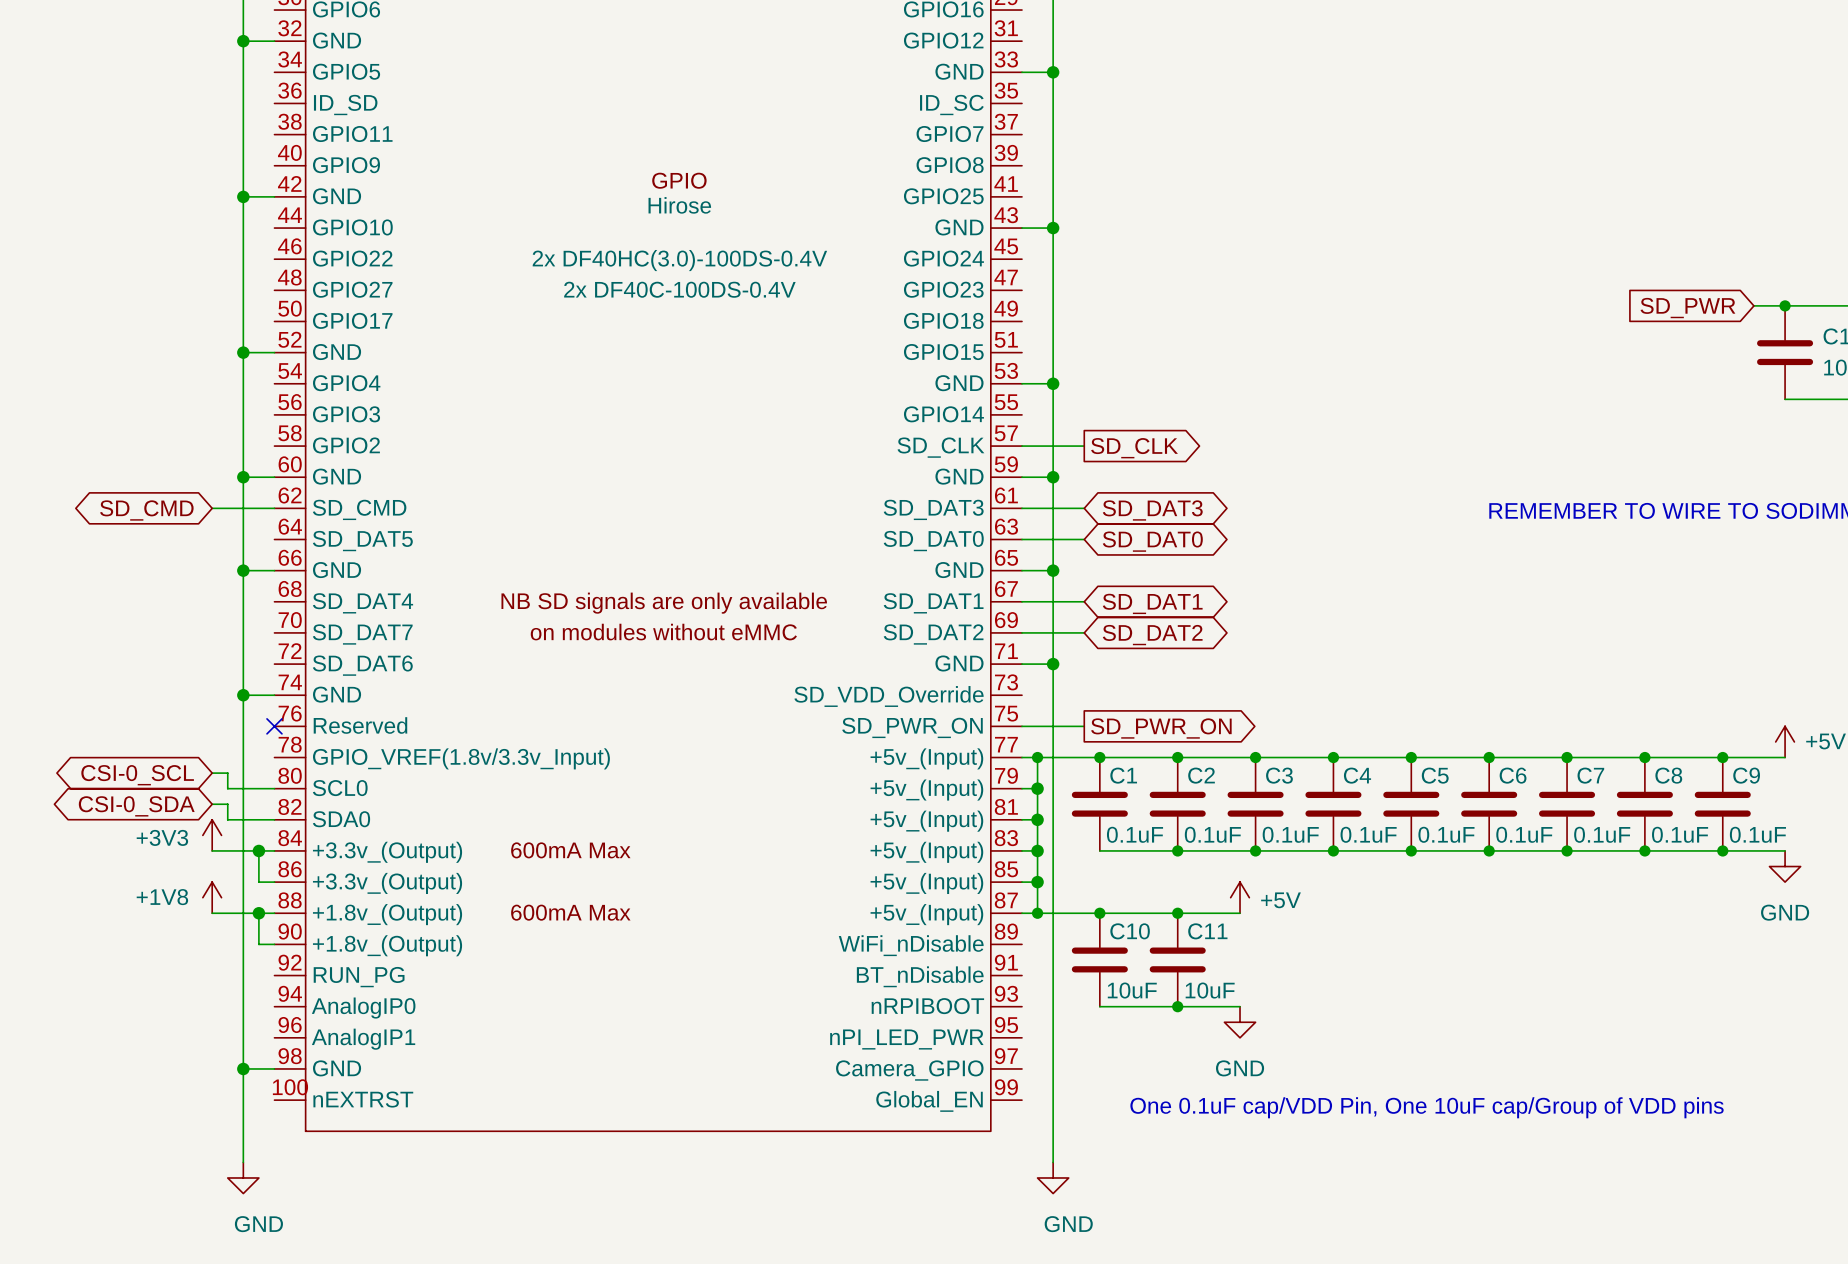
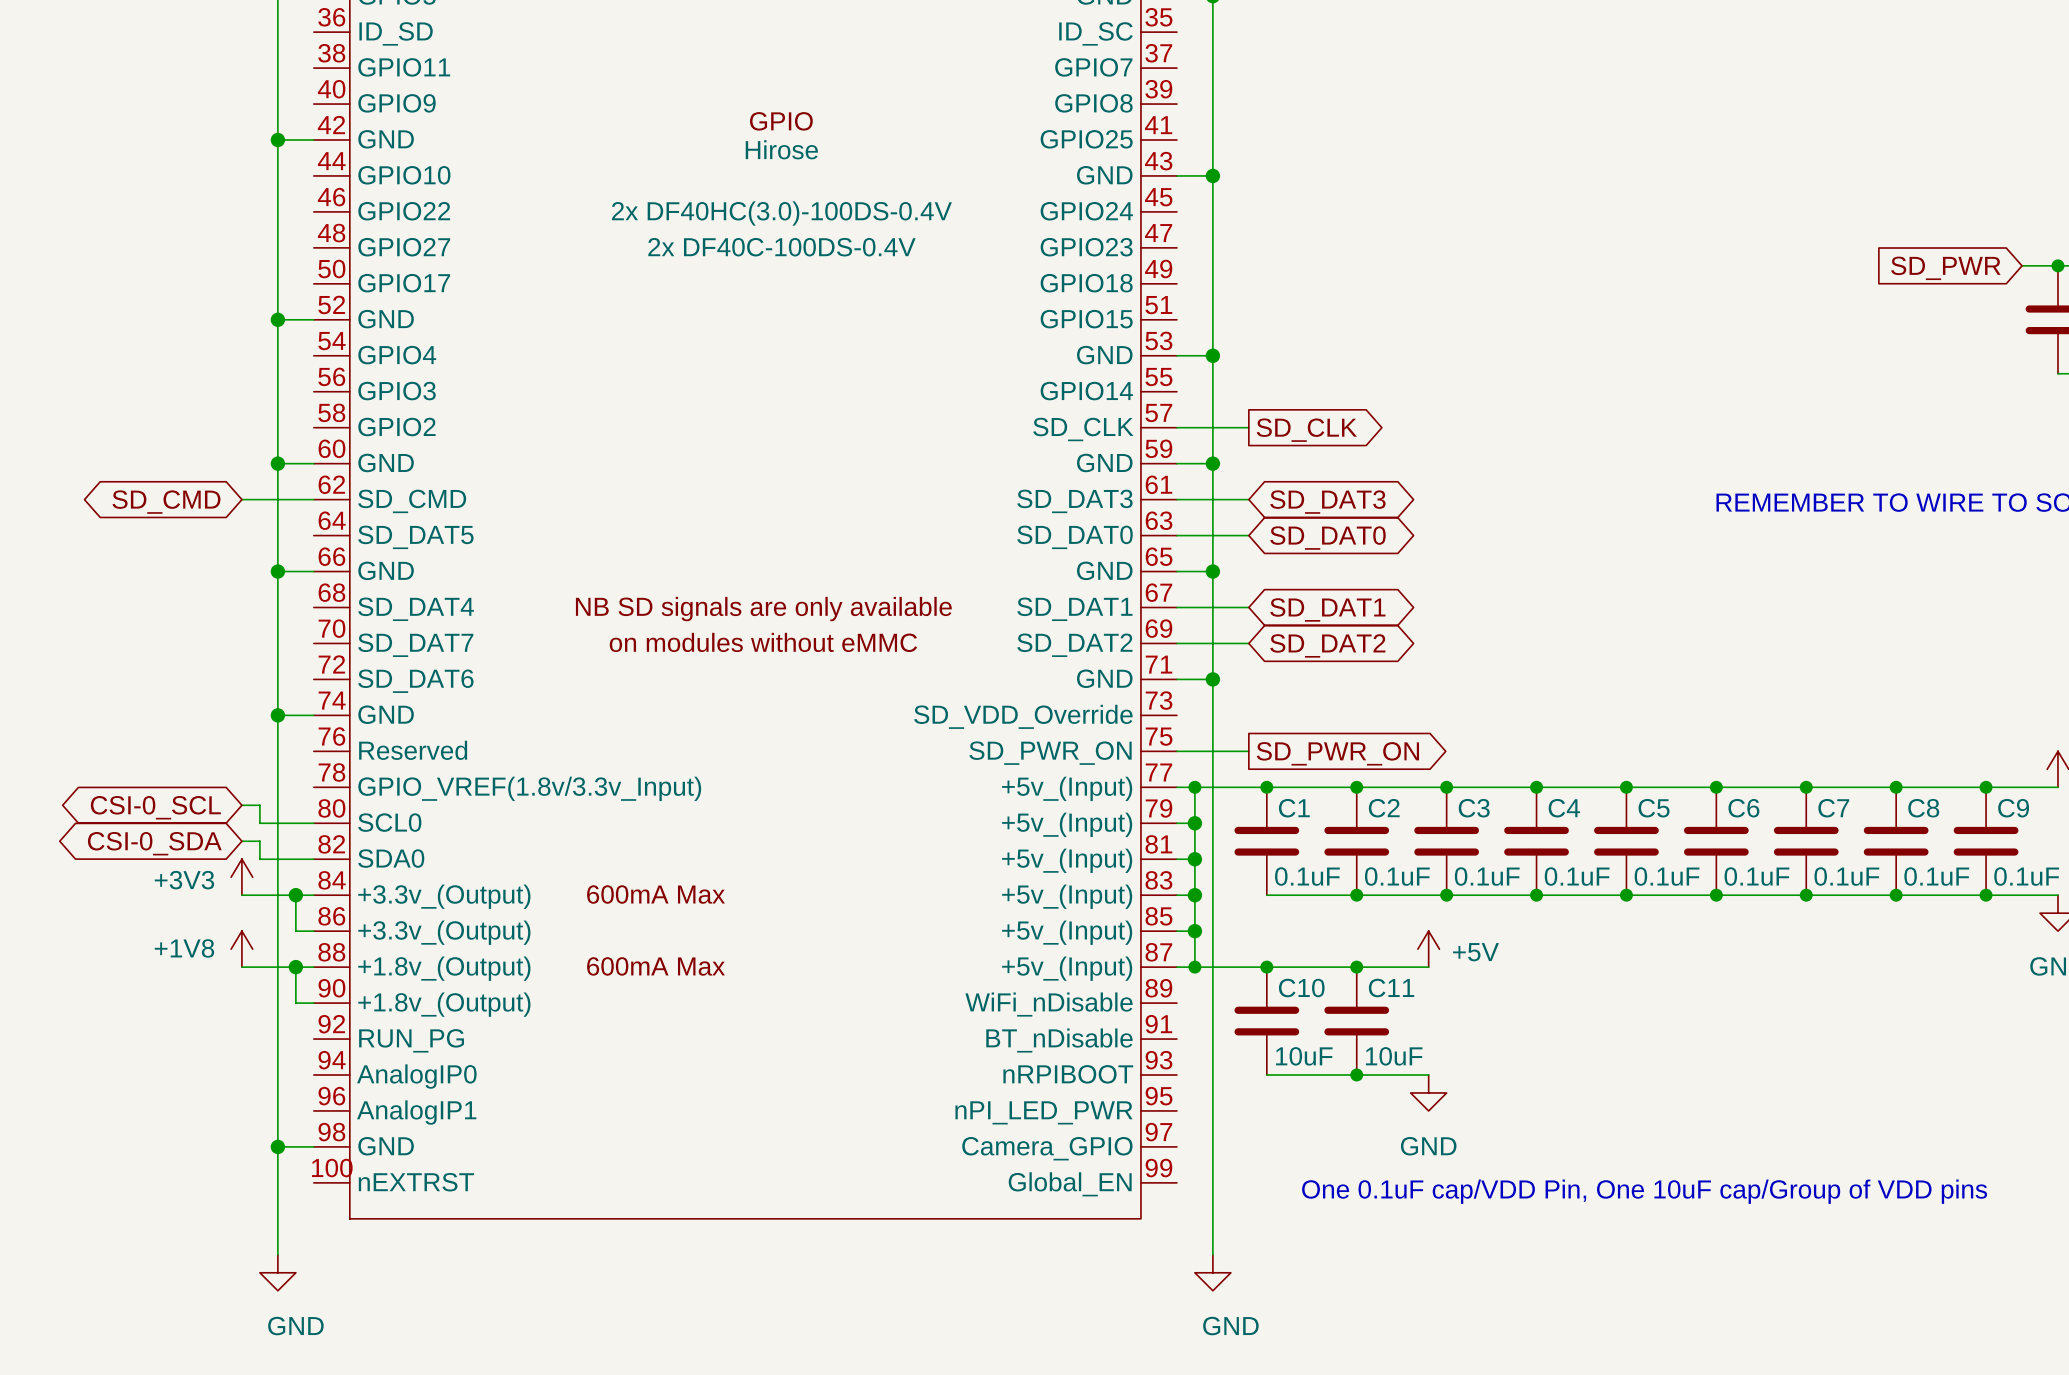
no-connect mark: (274, 726) -> none

